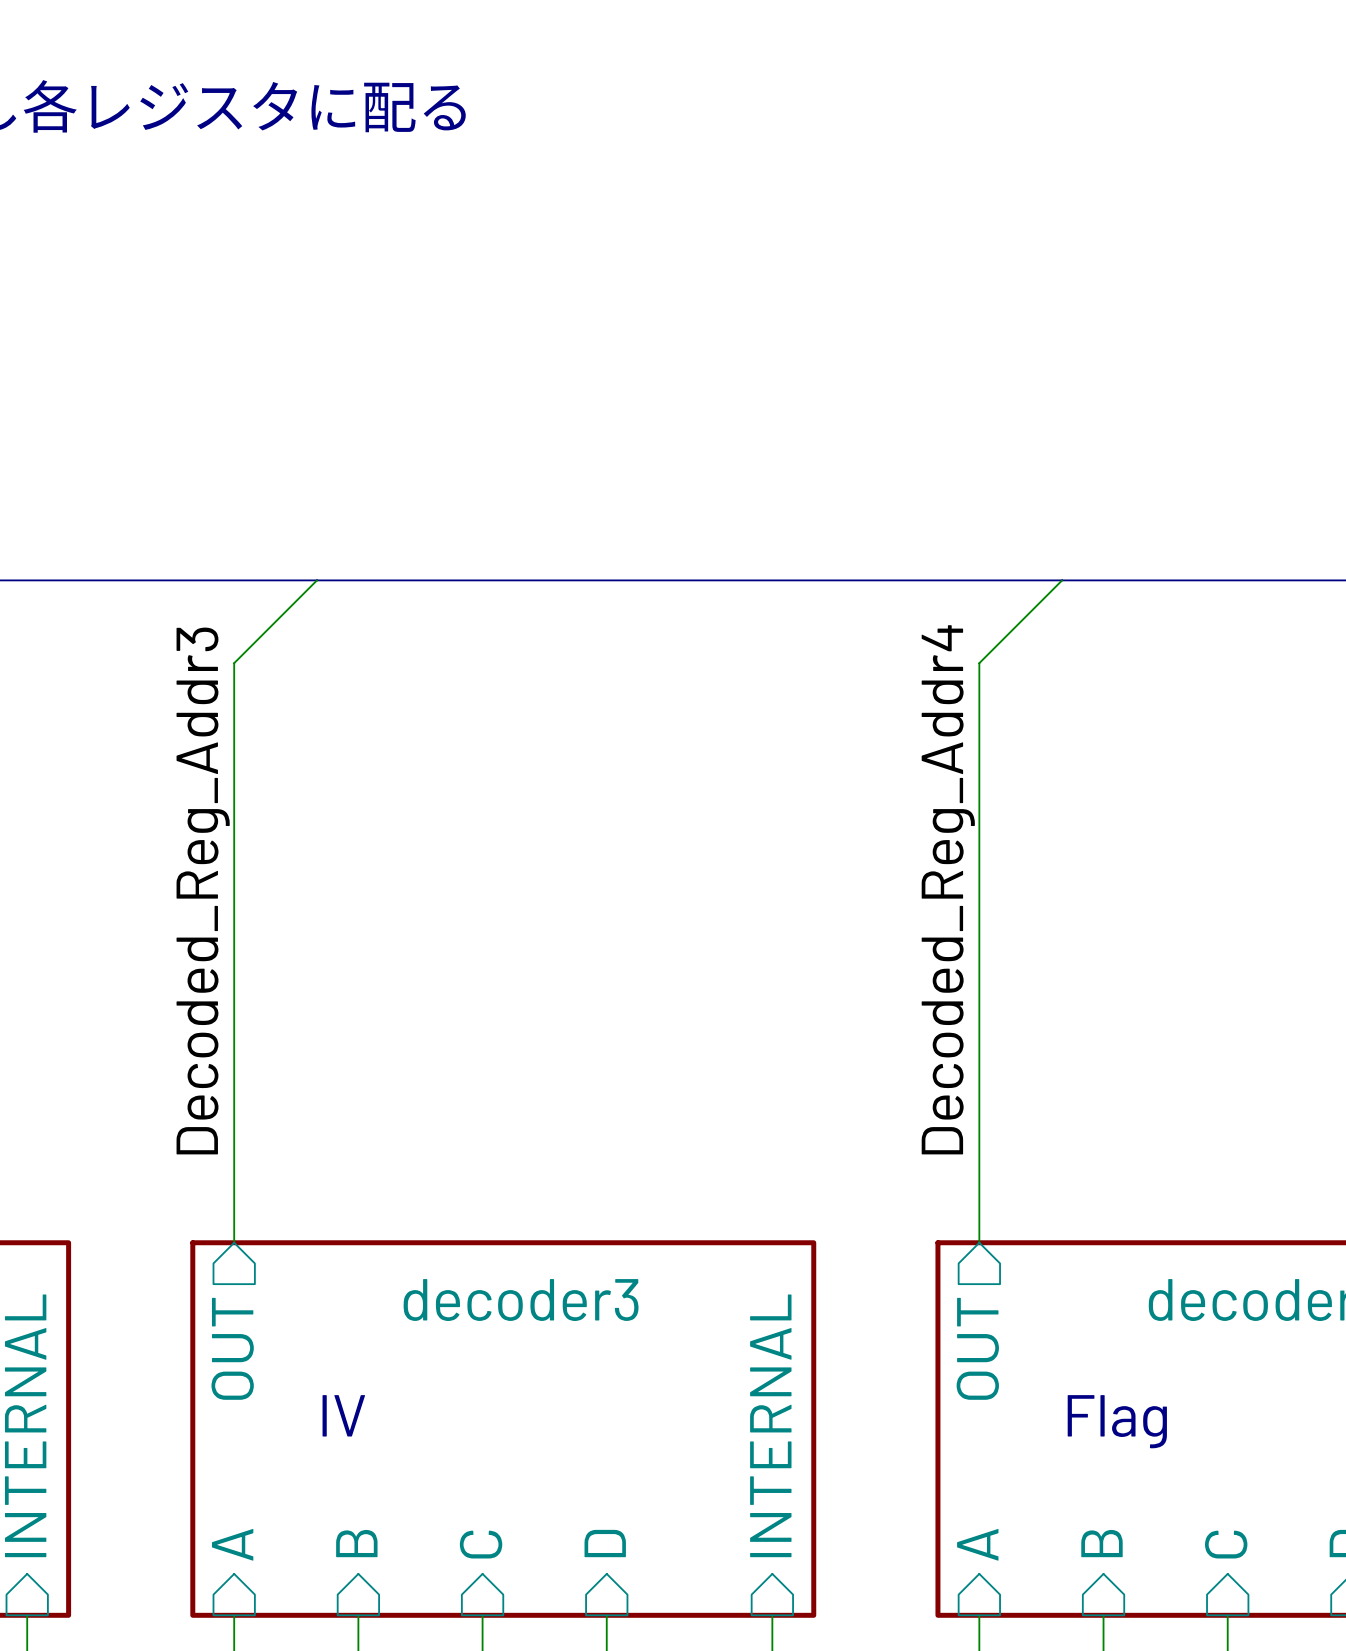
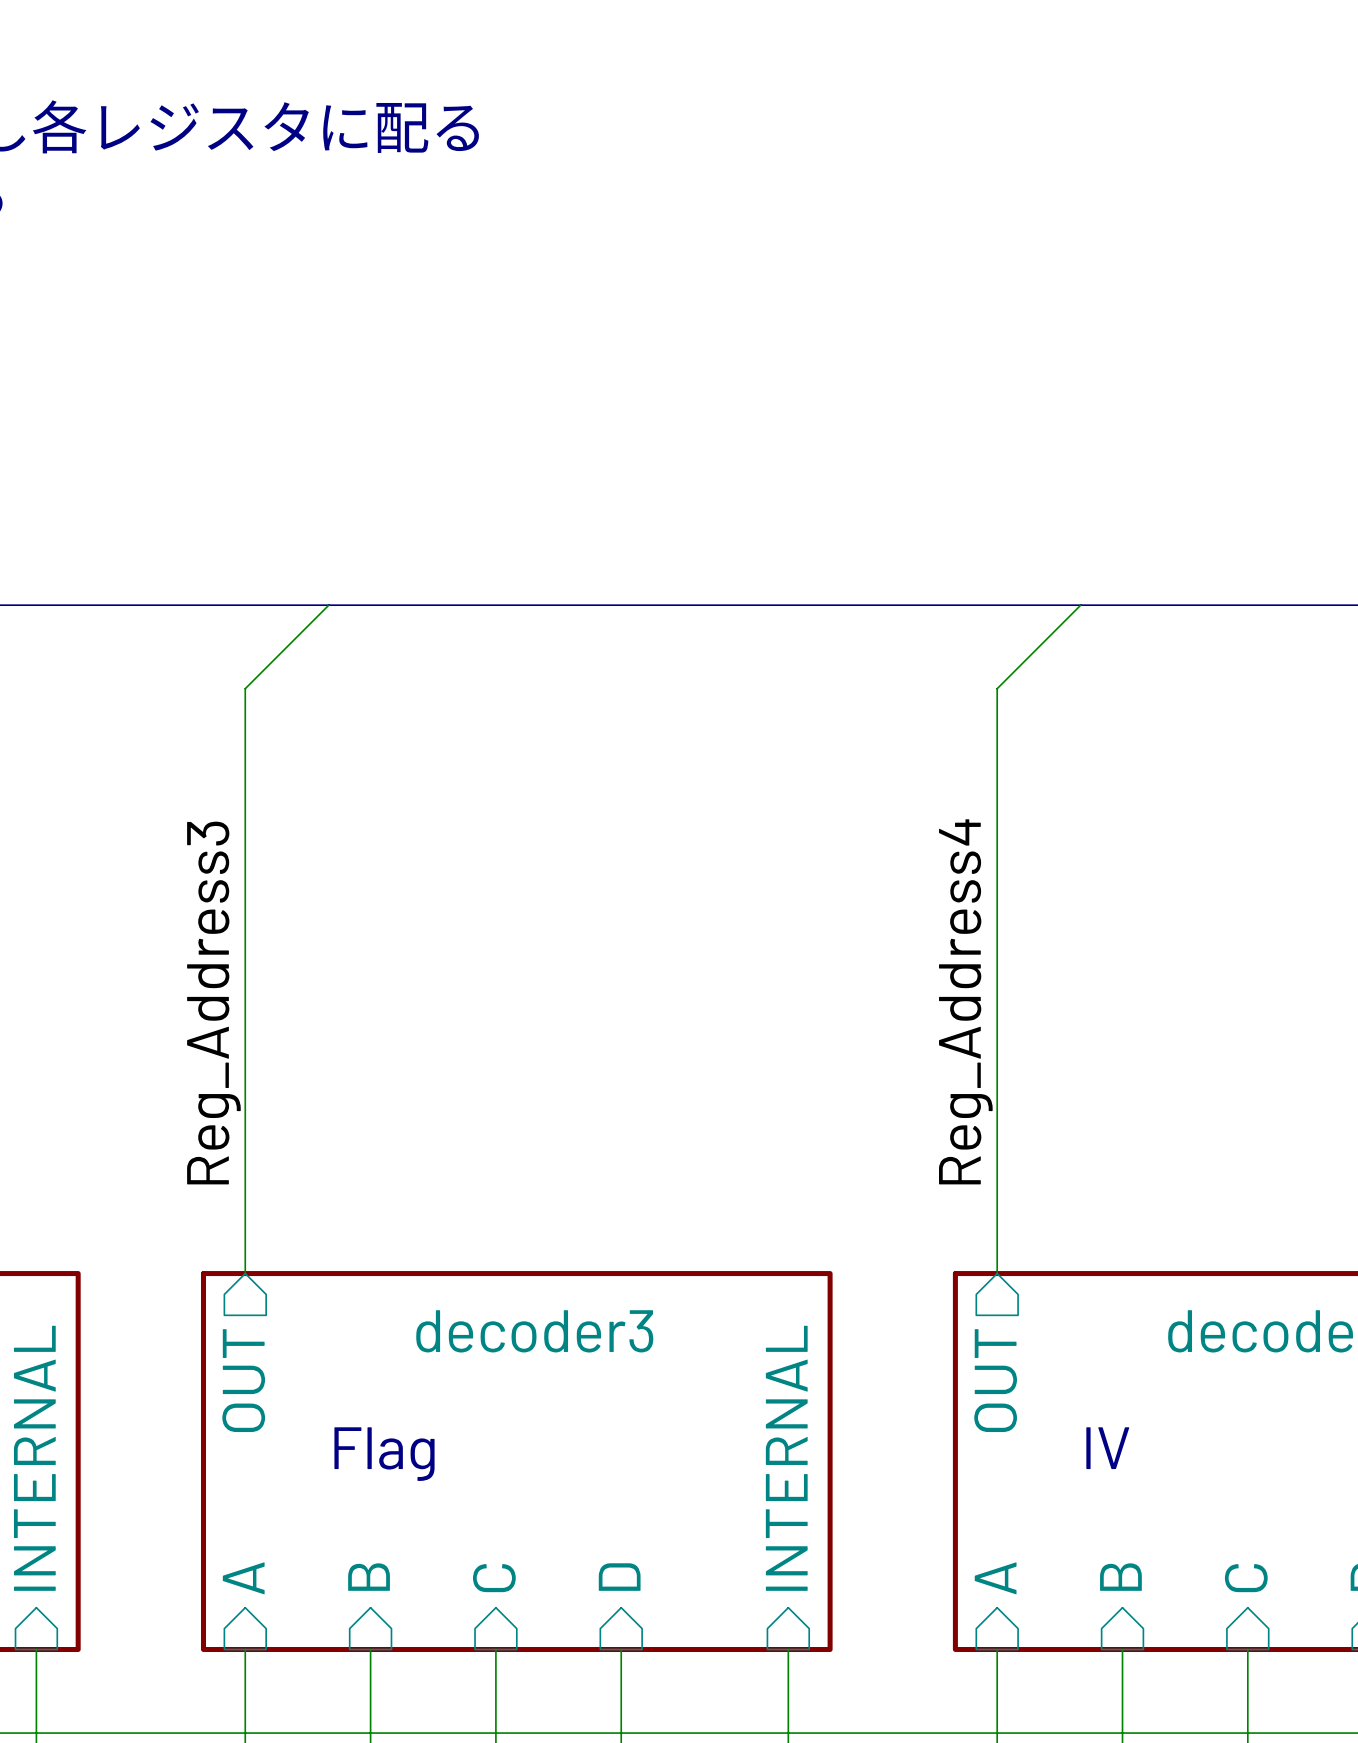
label: Decoded_Reg_Addr4 (948, 889) -> Reg_Address4 (965, 1001)
label: Decoded_Reg_Addr3 (203, 890) -> Reg_Address3 (213, 1003)
text: IV (343, 1415) -> Flag (384, 1454)
text: Flag (1117, 1421) -> IV (1107, 1448)

